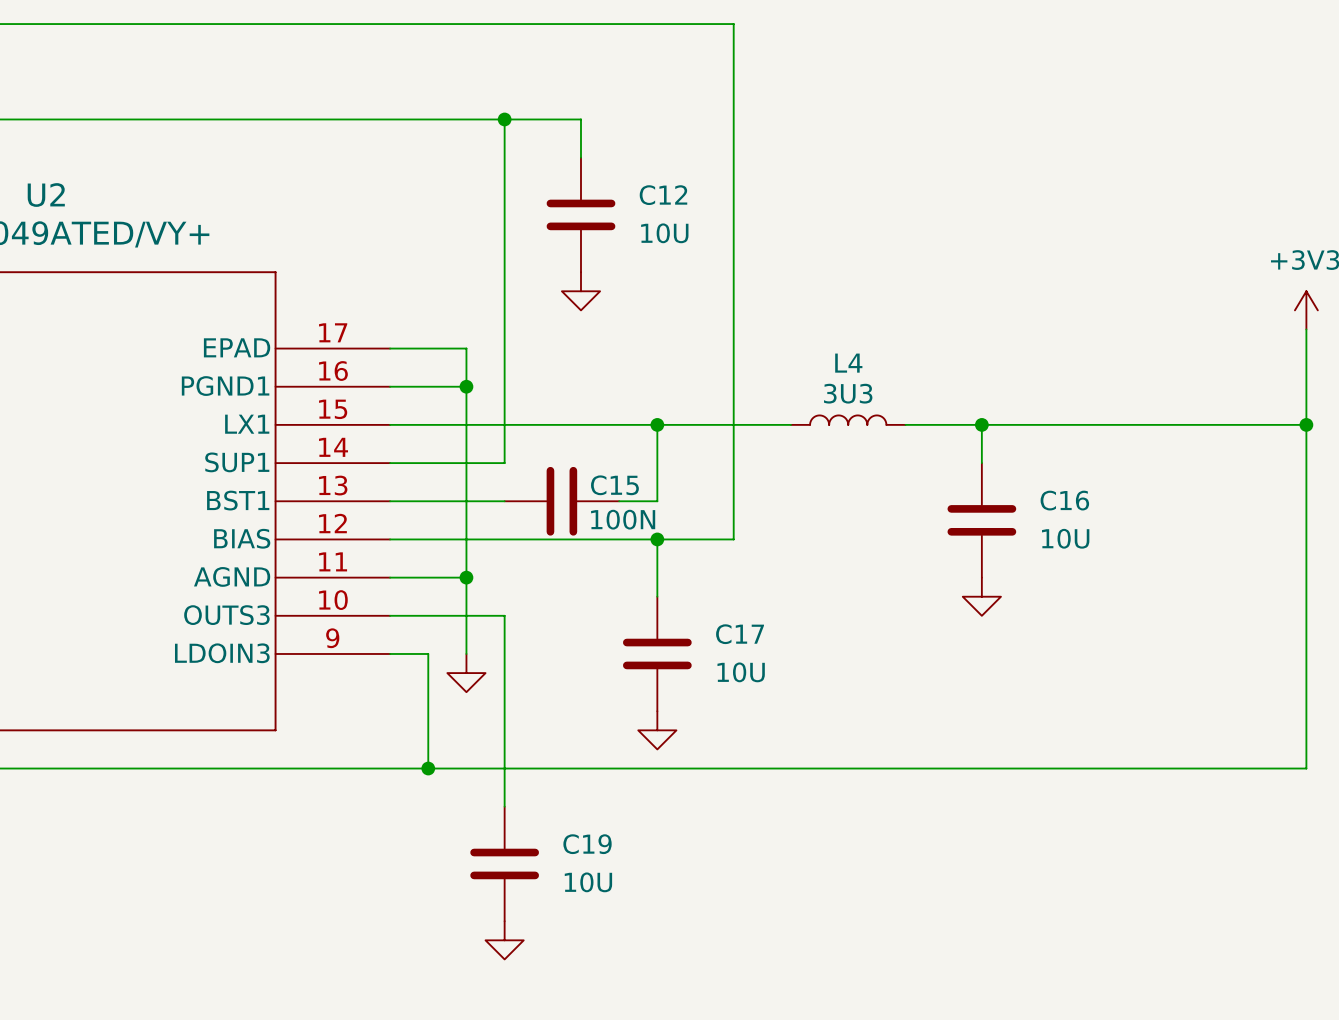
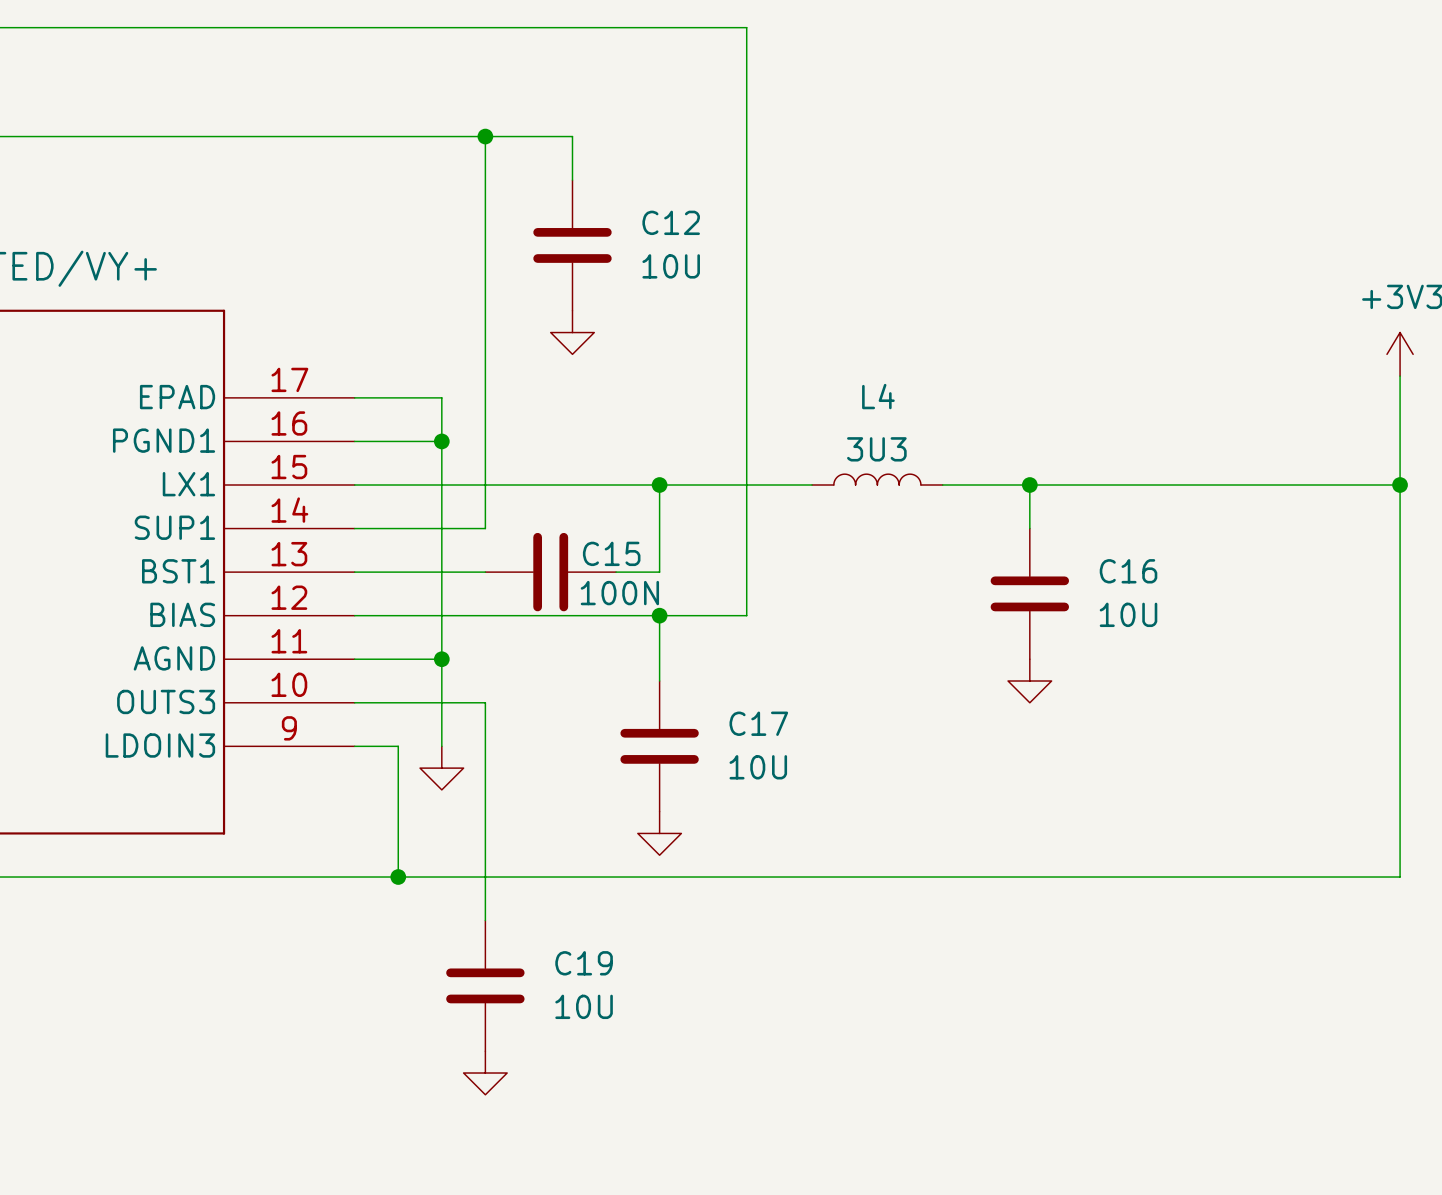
L4 name position: L4 (848, 363) -> L4 (878, 396)

